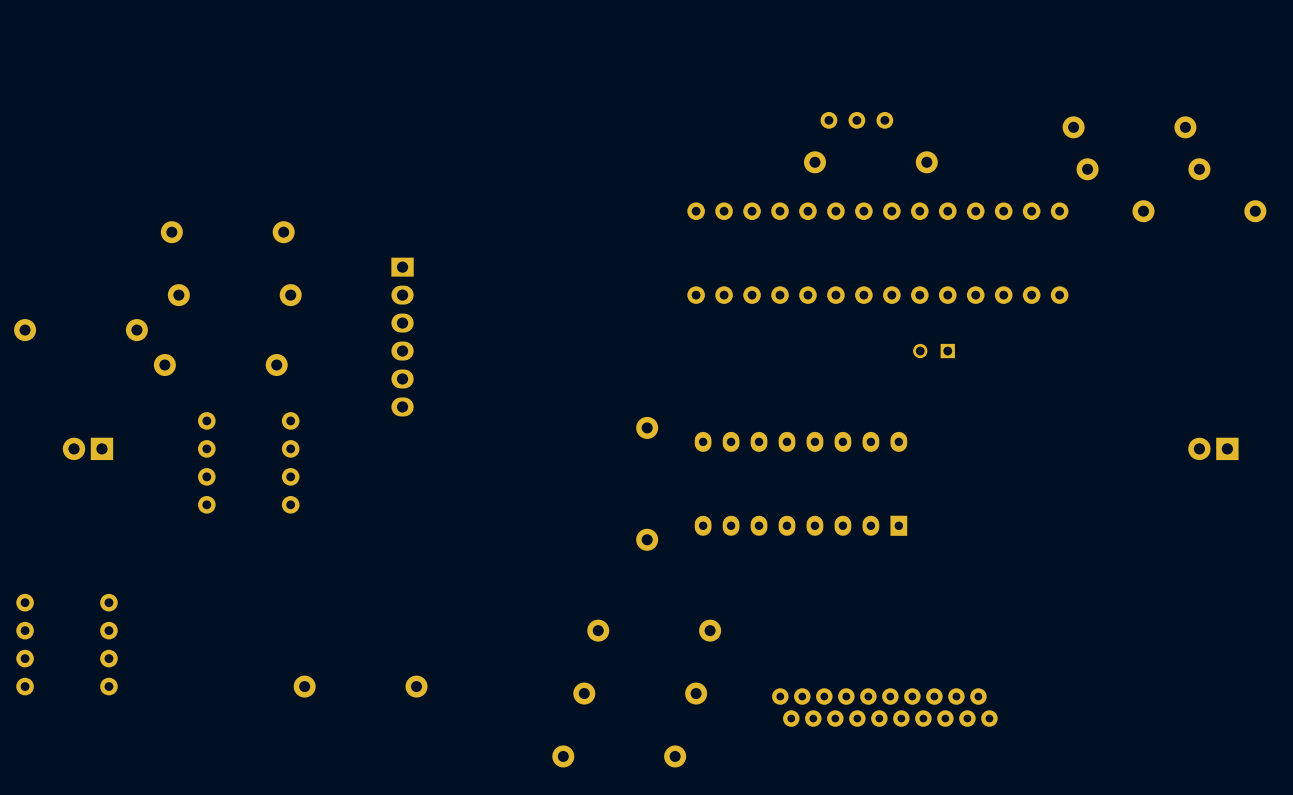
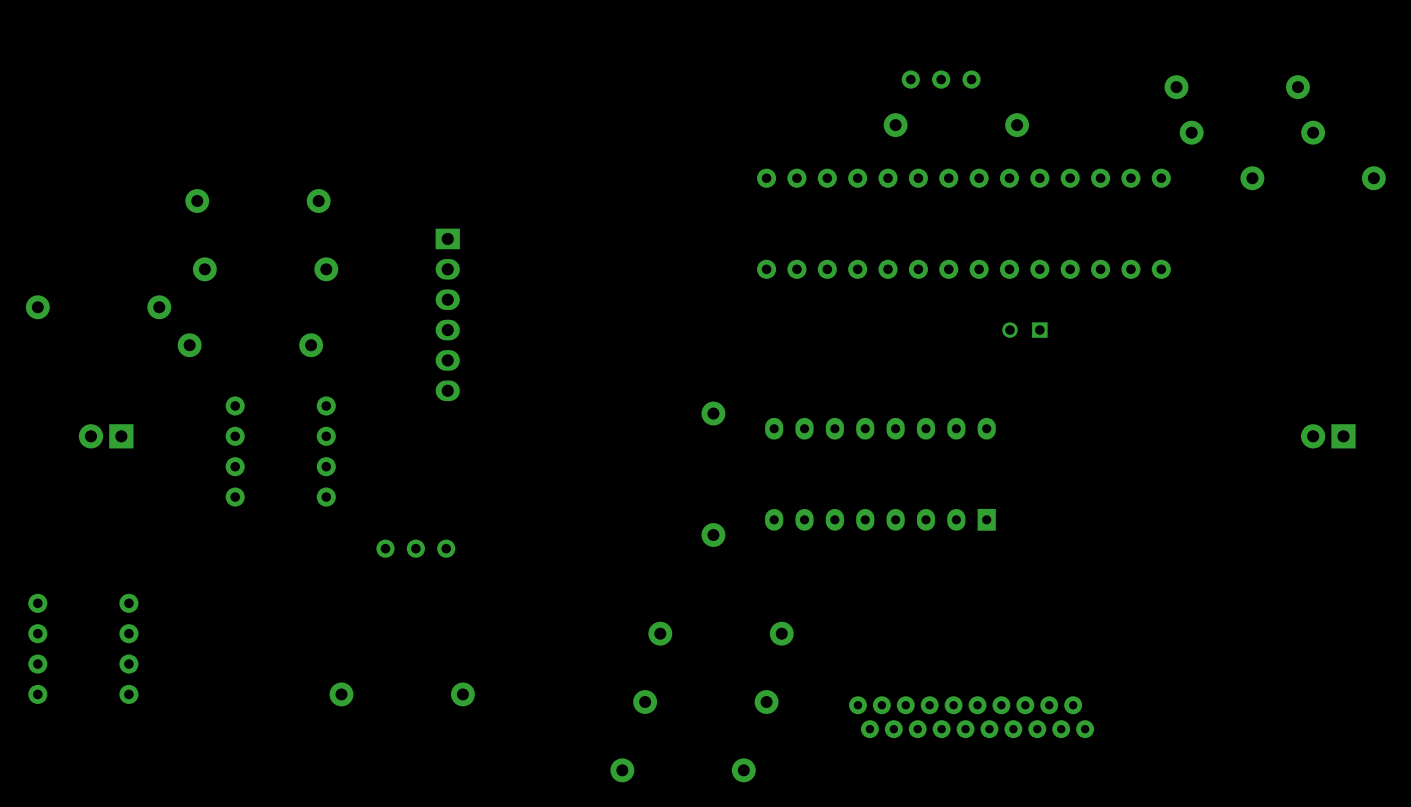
part: none -> (415, 548)

